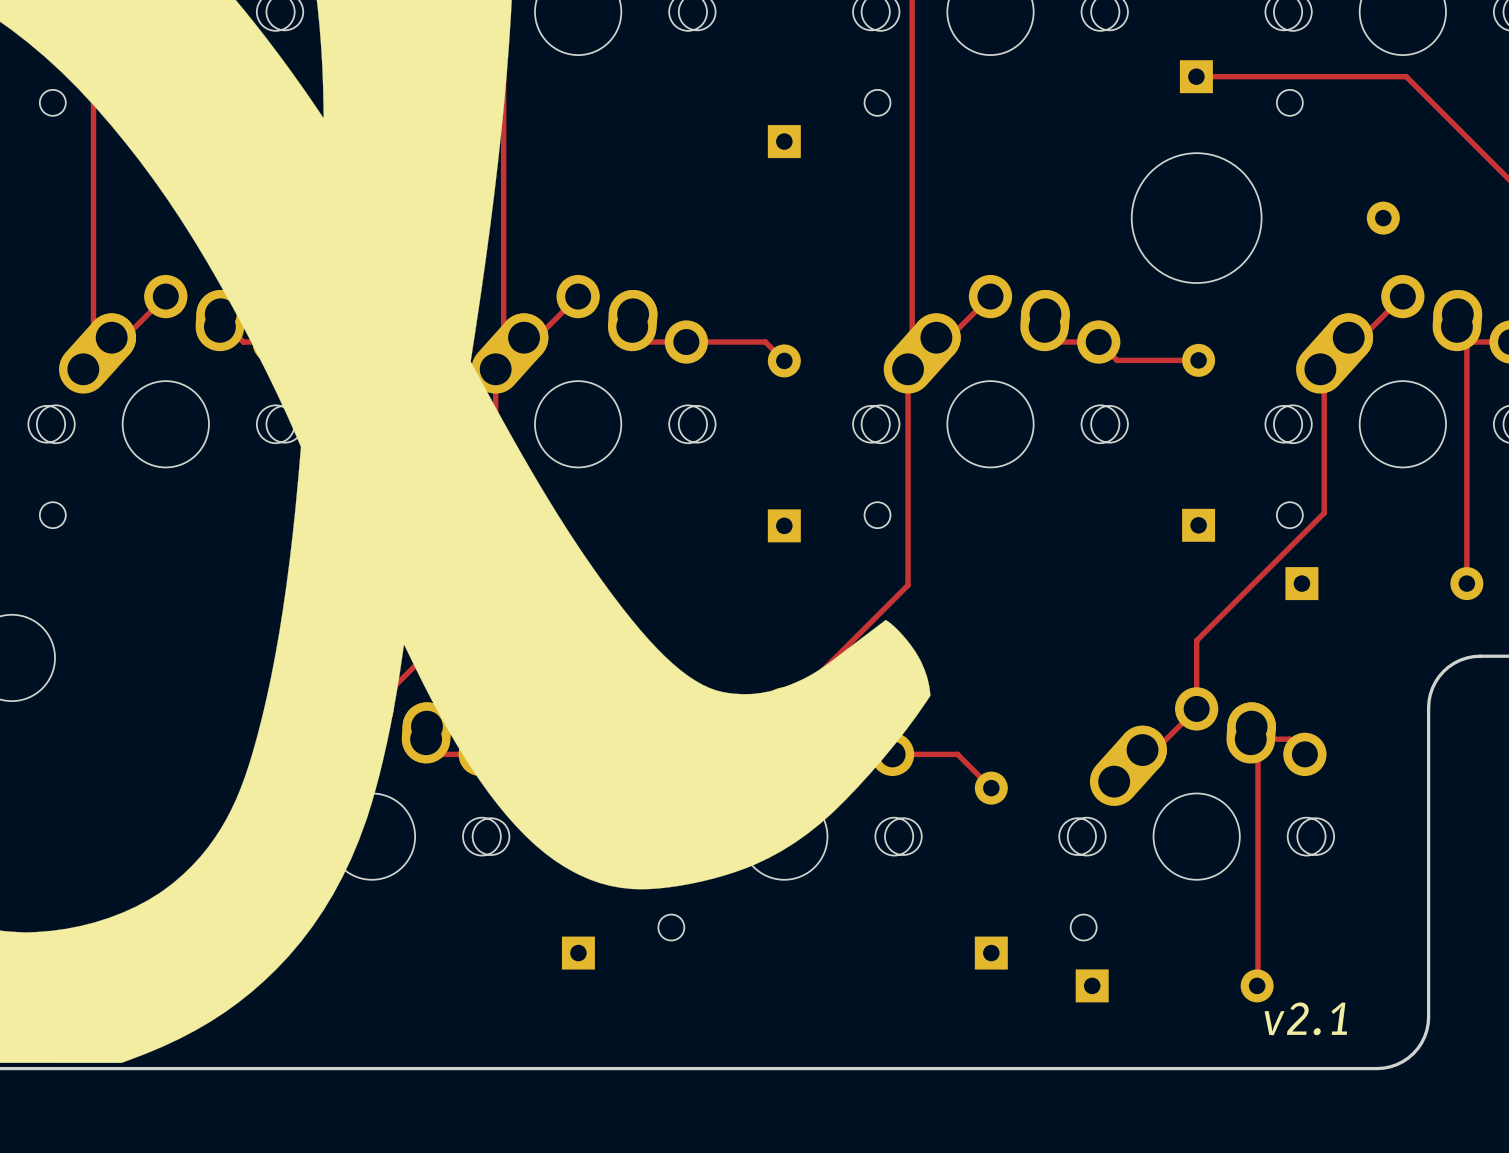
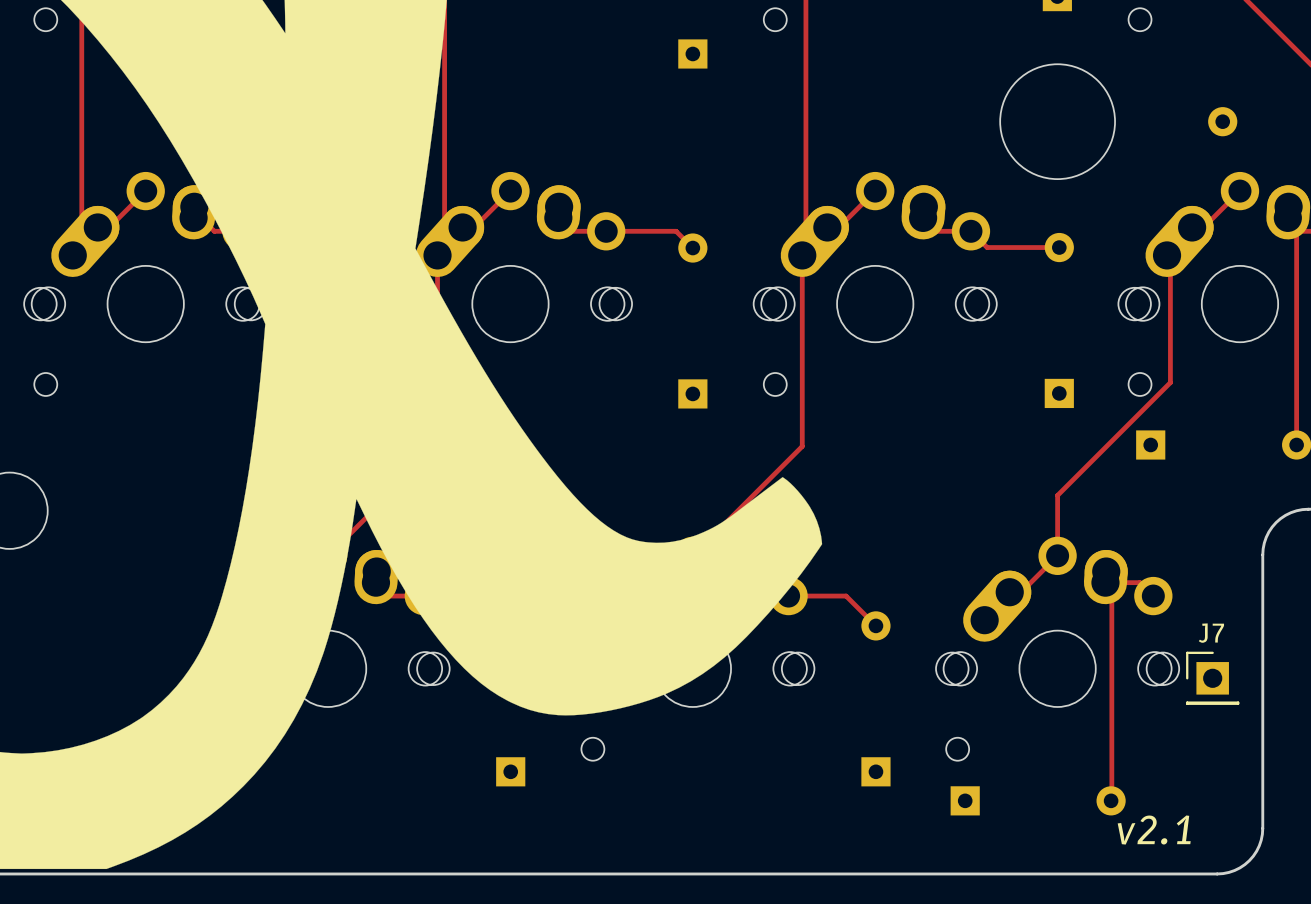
J7: none -> (1212, 678)

